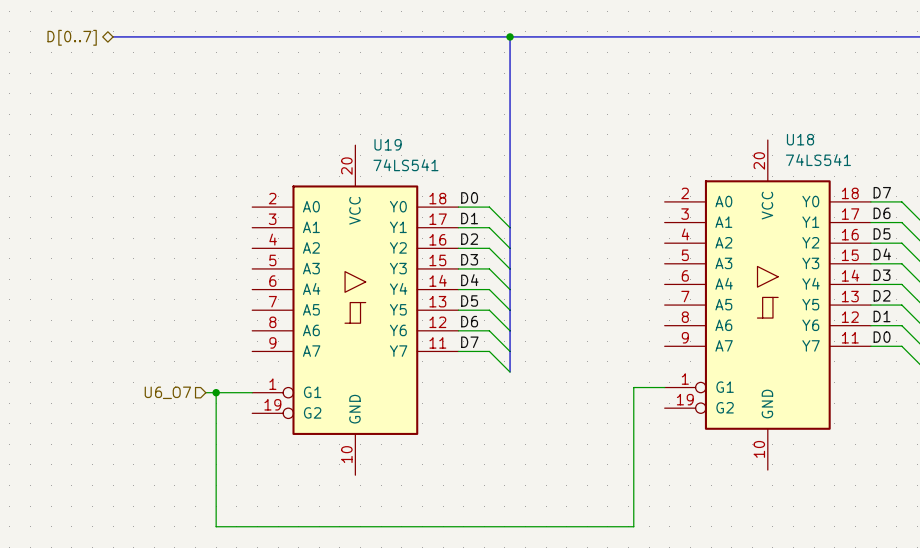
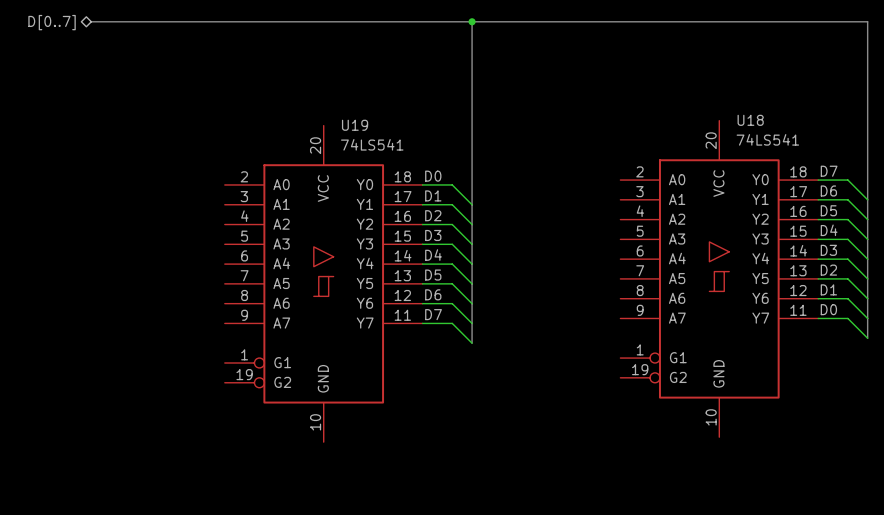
wire: (664, 387) (633, 387) (633, 526) (216, 526) (216, 392) -> none
hierarchical label: U6_O7 (167, 392) -> none
wire: (205, 392) (252, 392) -> none
junction: (216, 392) -> none

